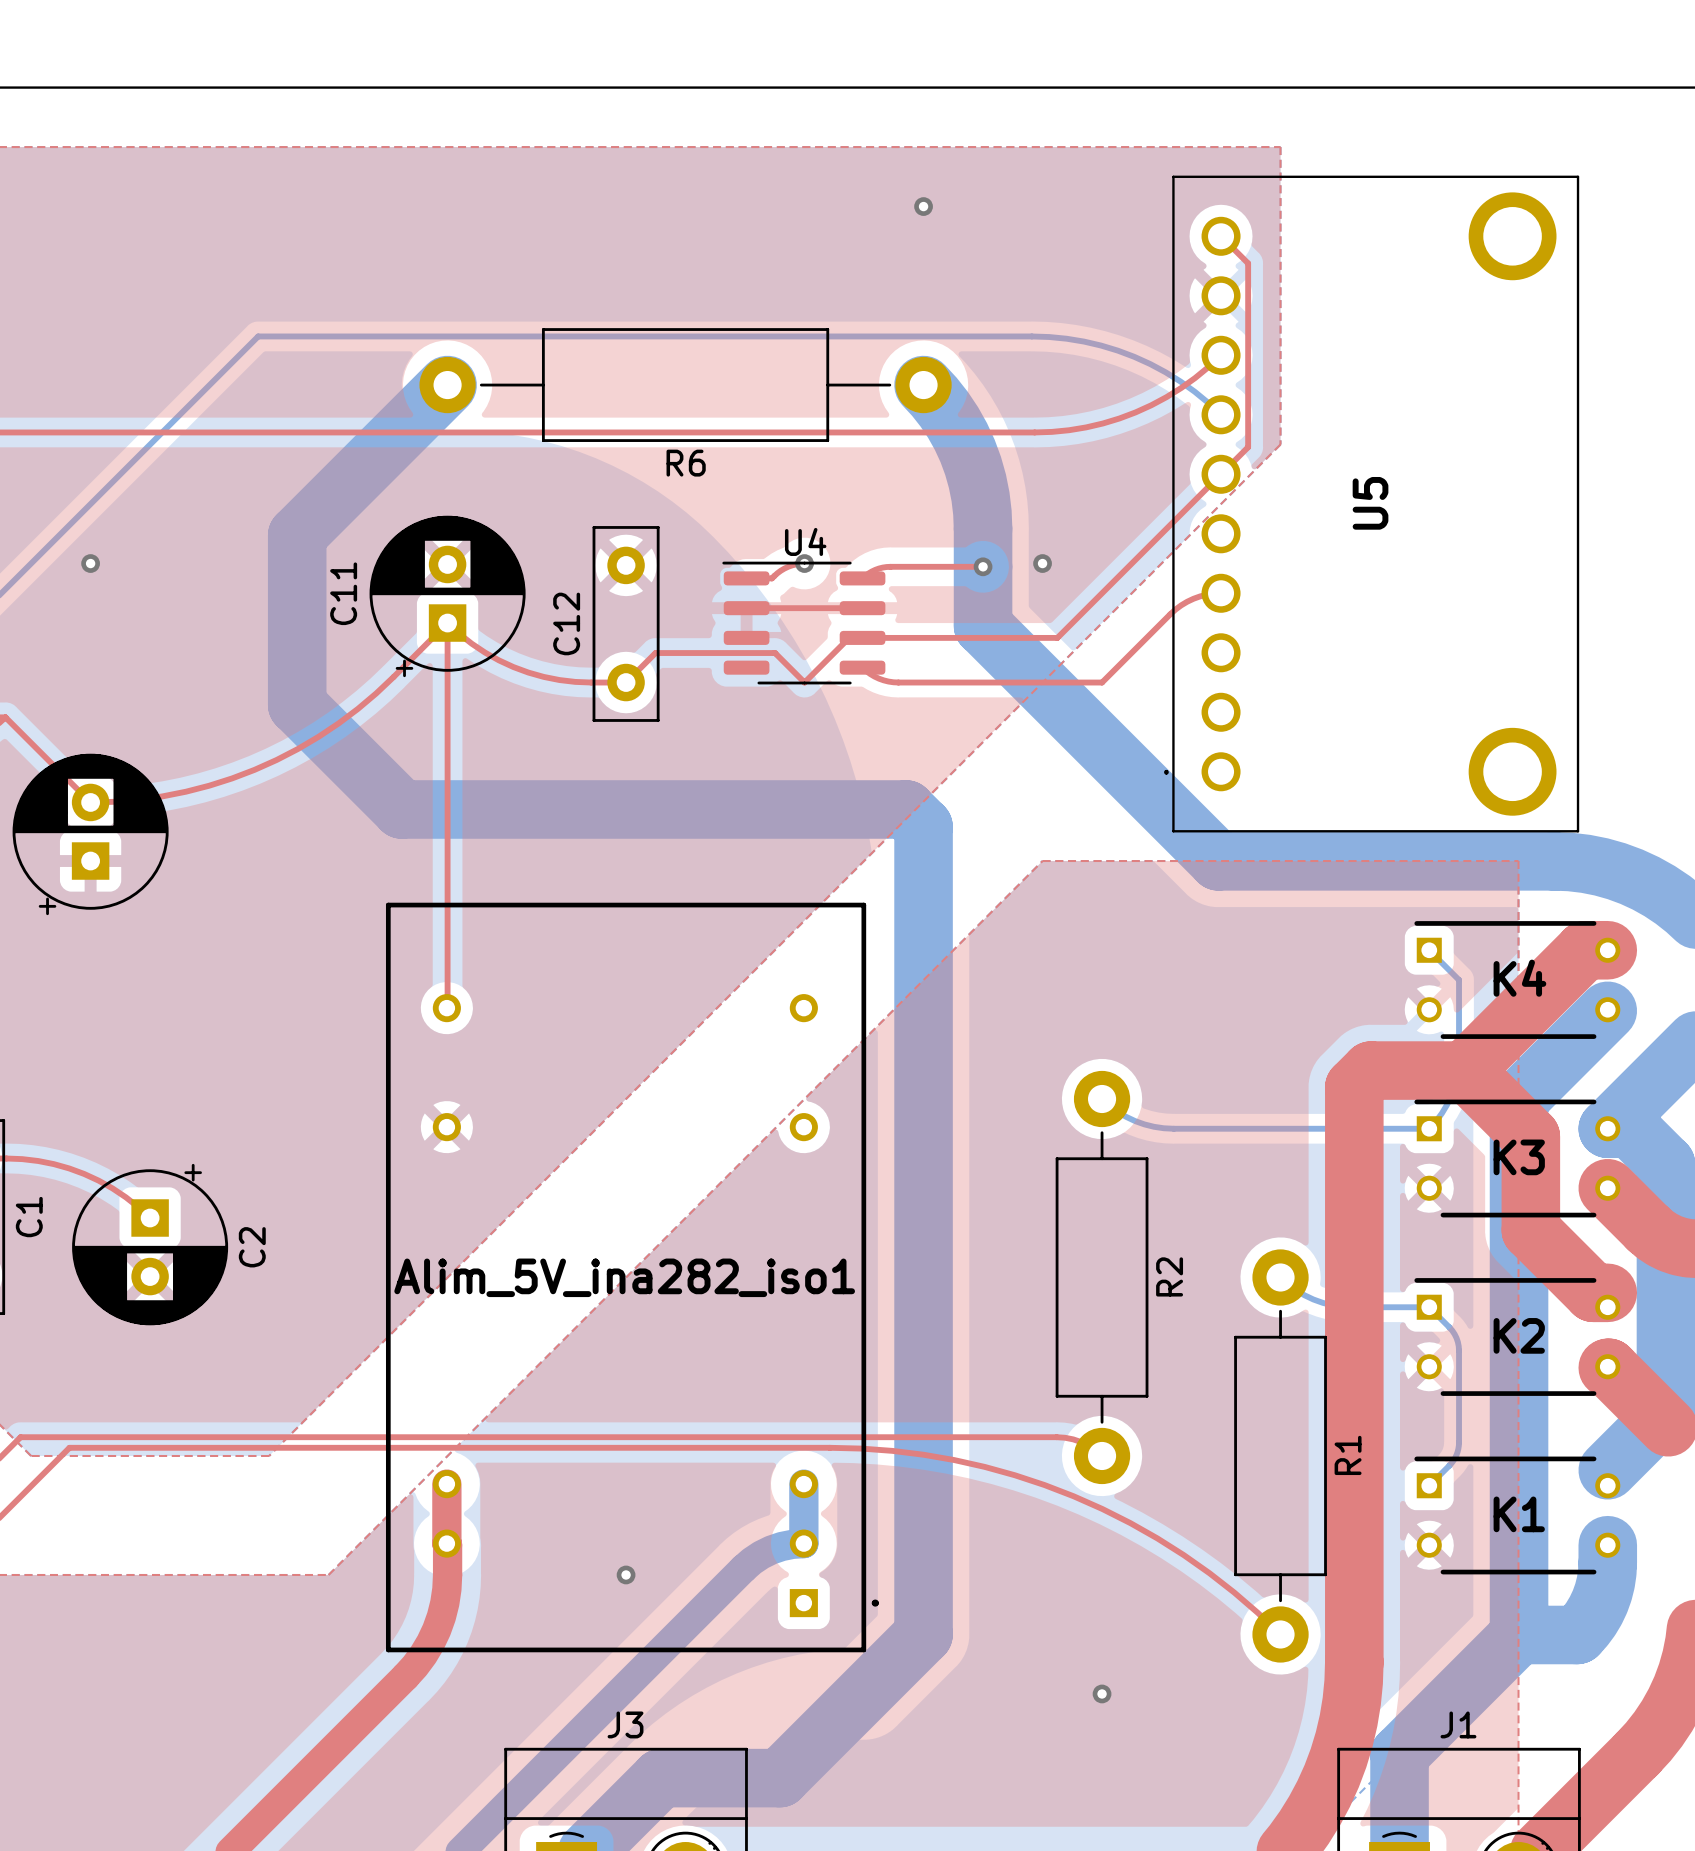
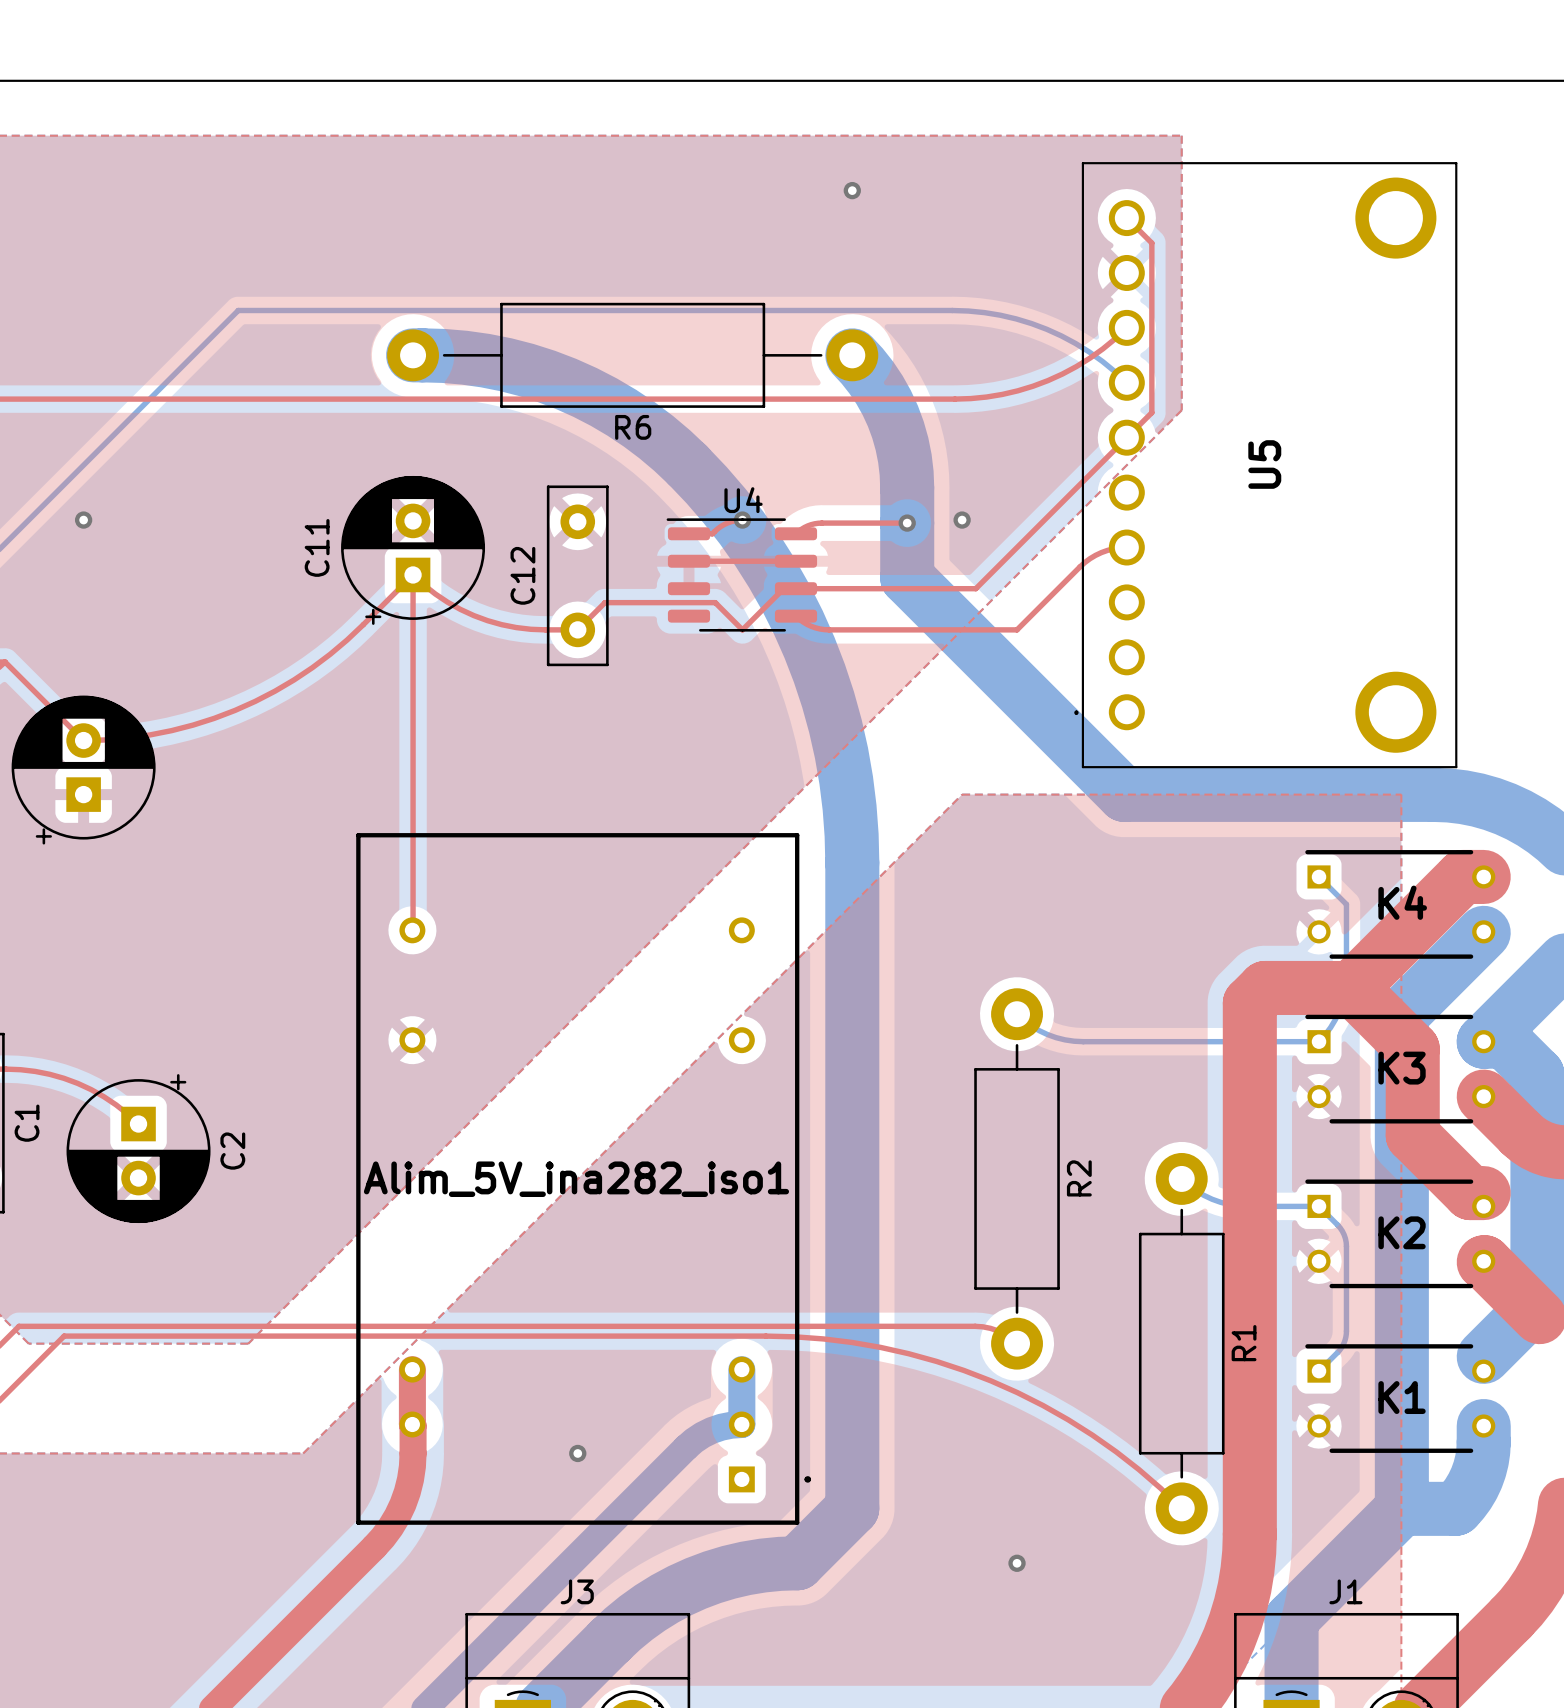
bottom track: (447, 385) (297, 535) (297, 704) (401, 809) (906, 809) (923, 826) (923, 934) -> (413, 355) (443, 355) (485, 360) (526, 369) (565, 383) (603, 402) (639, 424) (672, 450) (706, 485) (757, 550) (785, 597) (809, 647) (828, 699) (841, 753) (849, 807) (852, 862)
bottom track: (864, 1693) (779, 1778) (660, 1778) -> (797, 1563) (745, 1568) (695, 1583) (650, 1607) (609, 1640)

